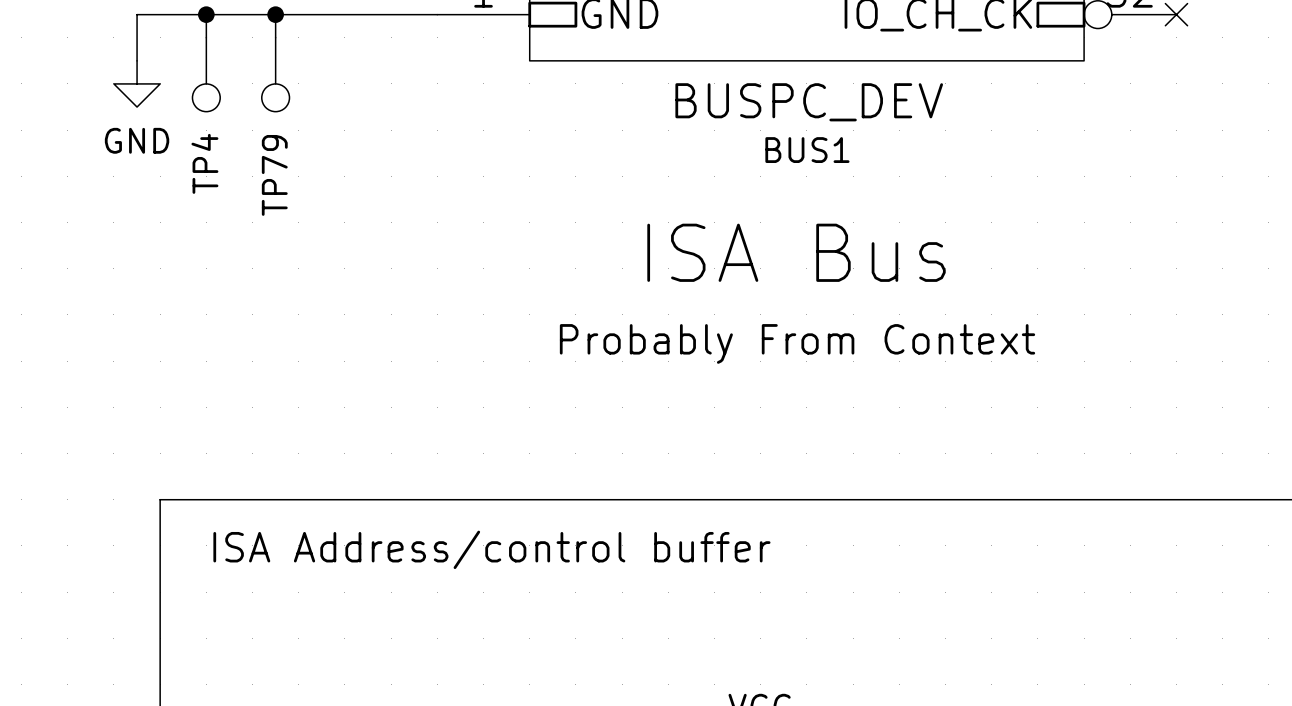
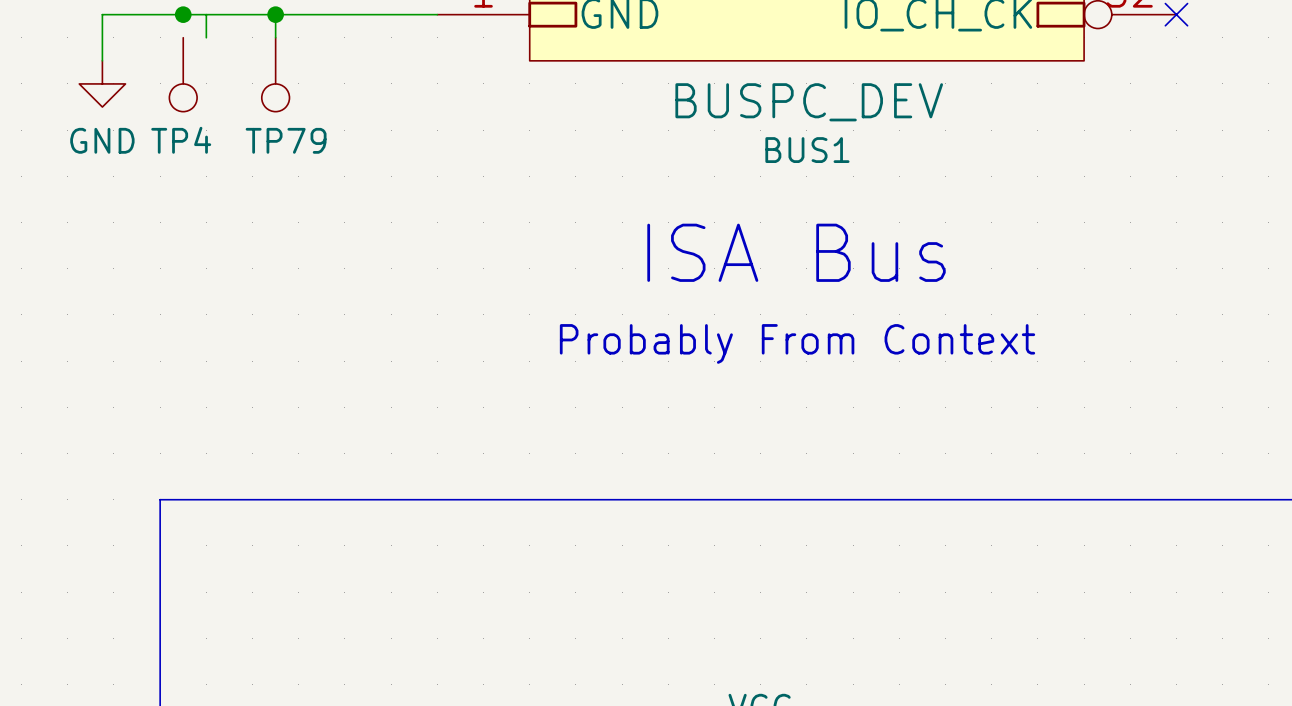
wire: (137, 14) (137, 60) -> (137, 14) (102, 14) (102, 60)
junction position: (206, 14) -> (183, 14)
TP4 position: (206, 74) -> (183, 74)
power symbol position: GND (137, 83) -> GND (102, 83)
TP4 name rotation: 0° (204, 163) -> 90° clockwise (181, 140)
TP79 name rotation: 0° (274, 175) -> 90° clockwise (286, 140)
text: ISA Address/control buffer (491, 549) -> none

